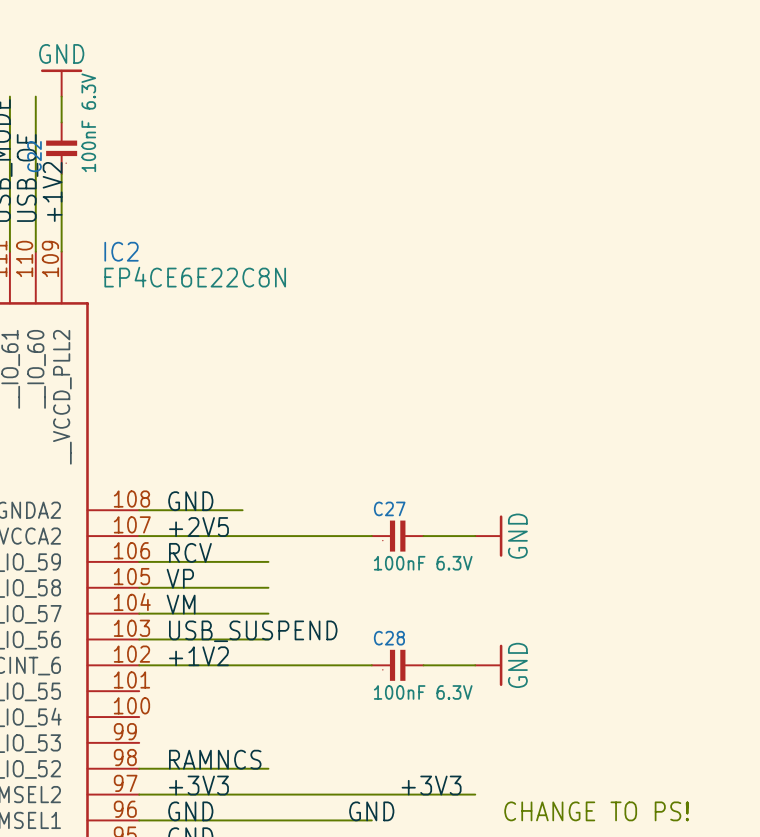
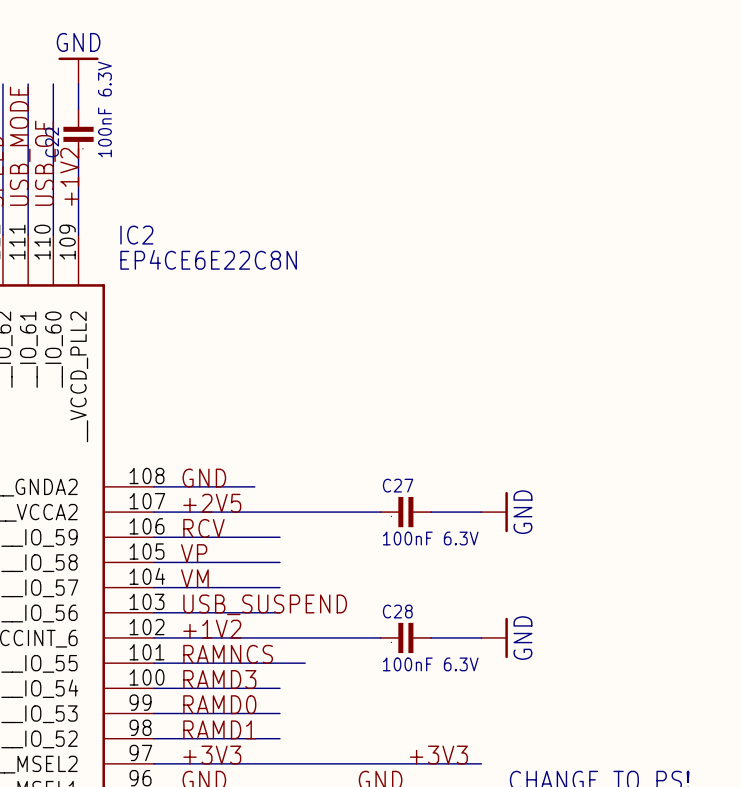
label: none -> RAMNCS (228, 654)
wire: none -> (154, 663) (305, 663)
label: none -> RAMD3 (219, 679)
wire: none -> (154, 688) (279, 688)
label: none -> RAMD0 (219, 704)
wire: none -> (154, 713) (279, 713)
label: RAMNCS (215, 759) -> RAMD1 (219, 729)

